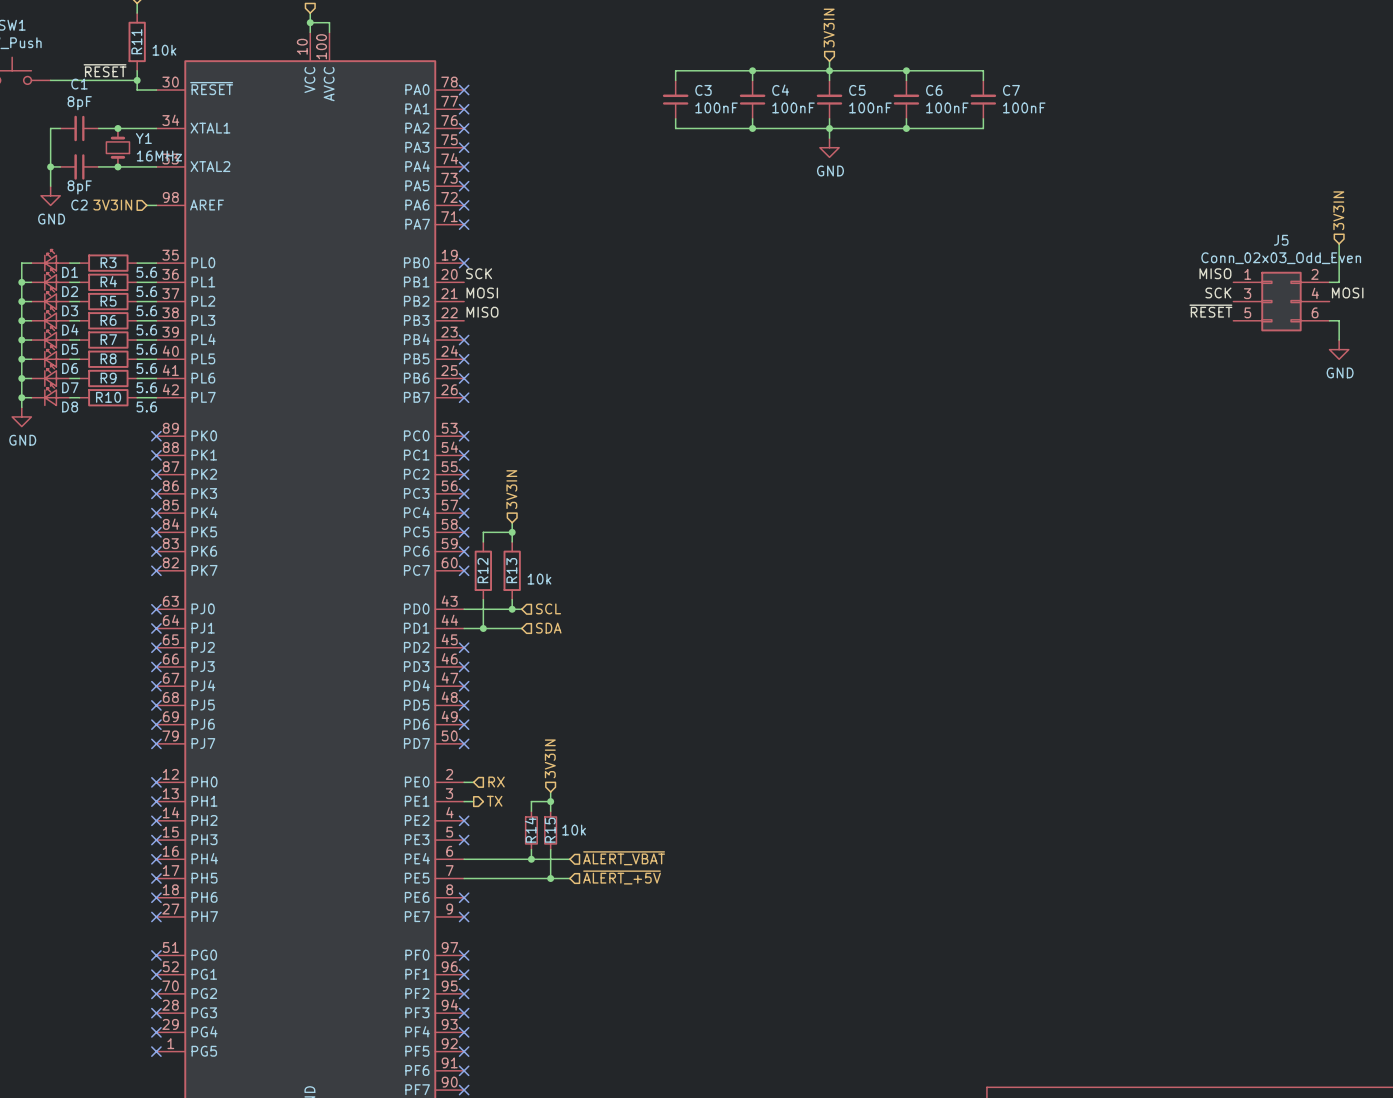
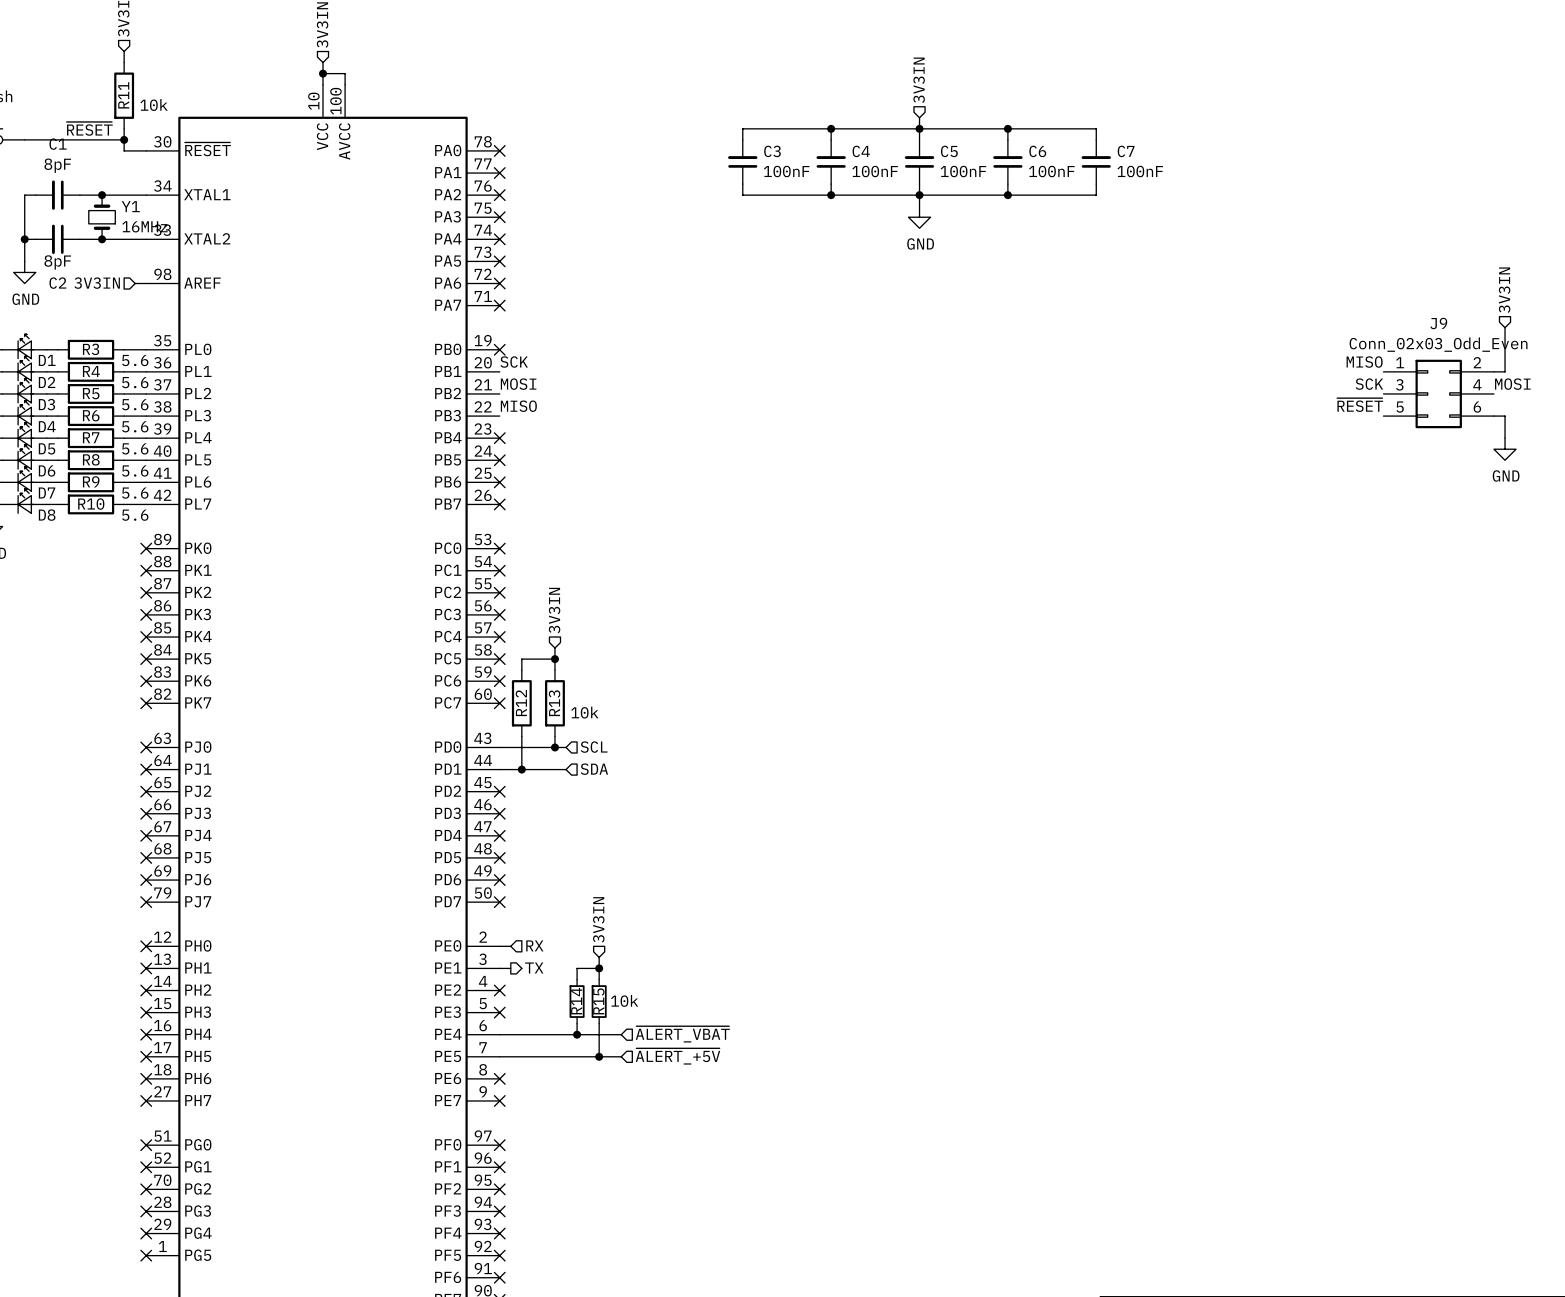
J5 name: J5 (1281, 240) -> J9 (1438, 323)

